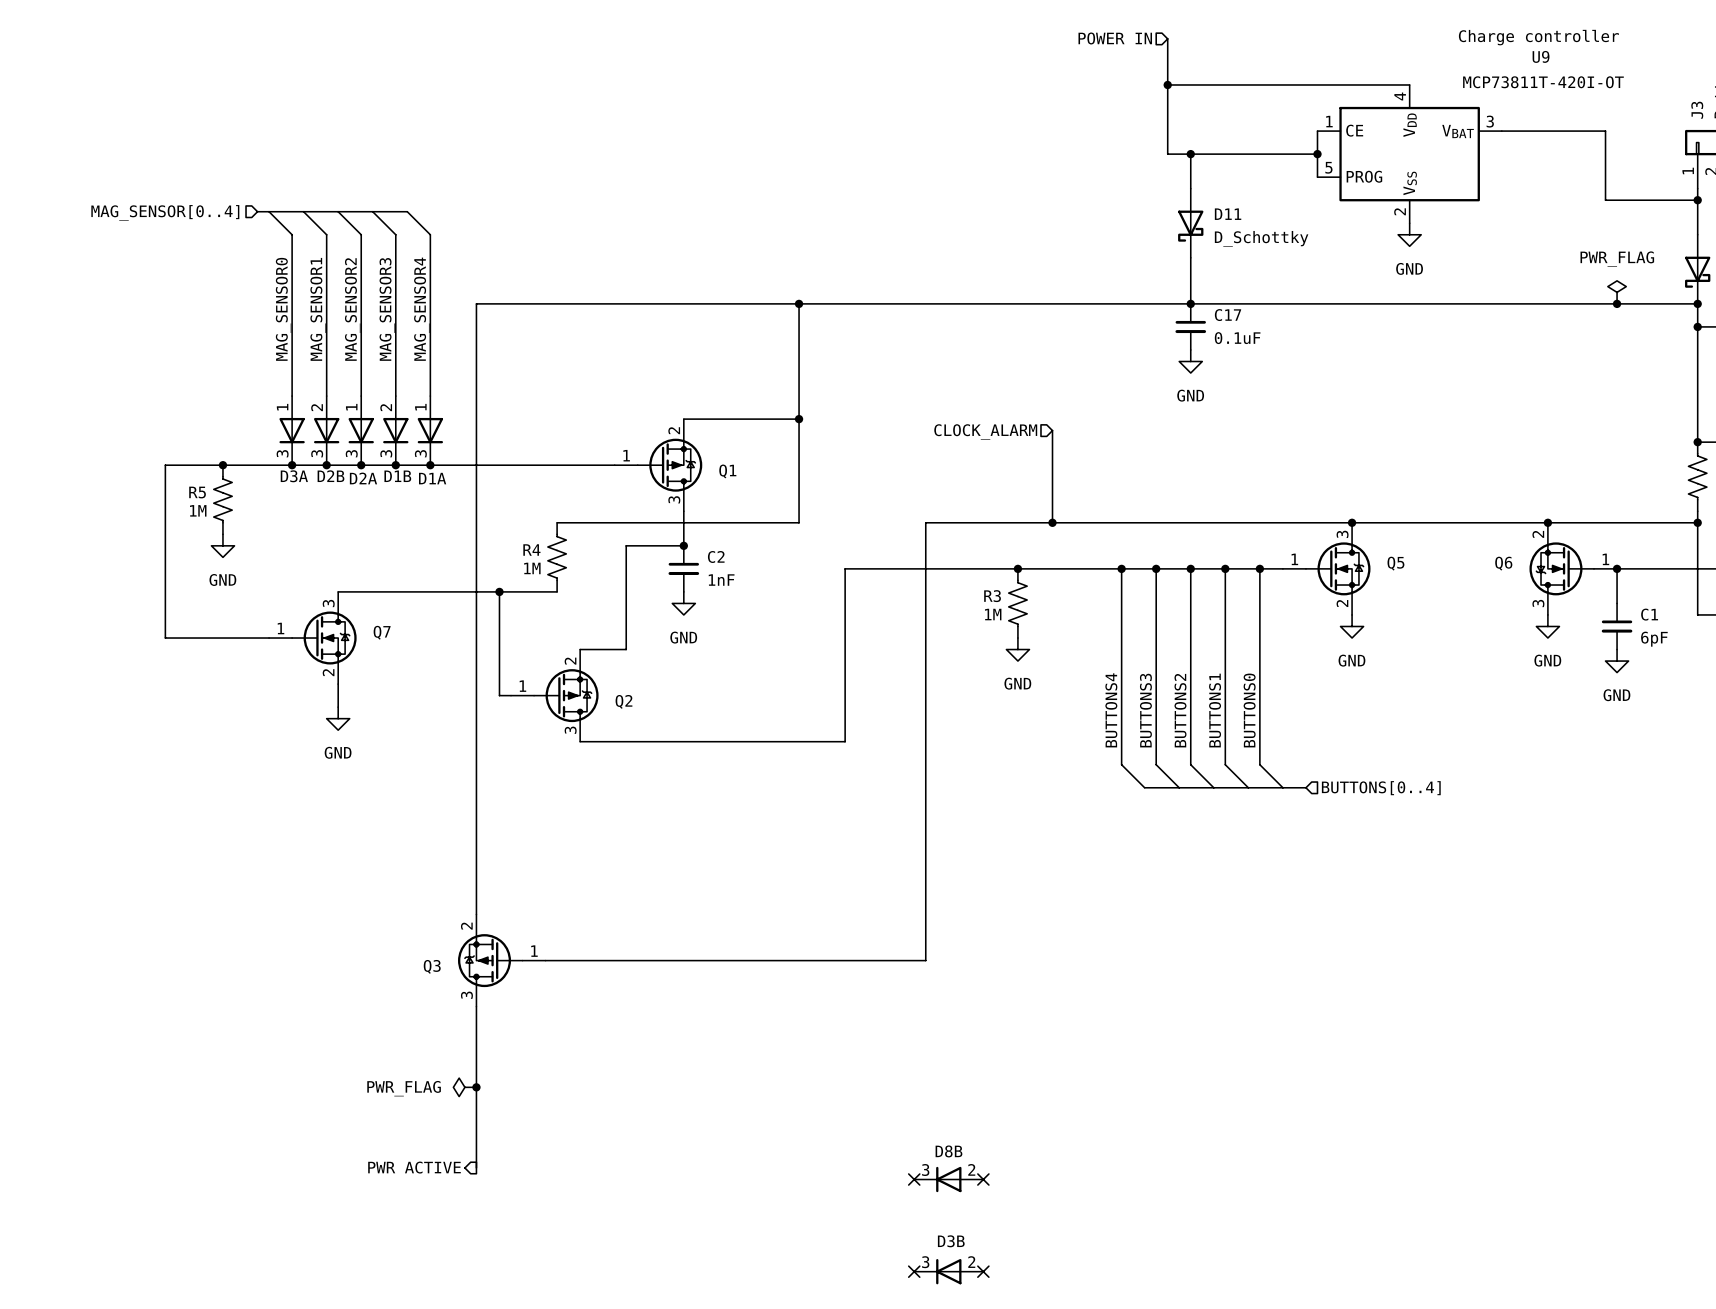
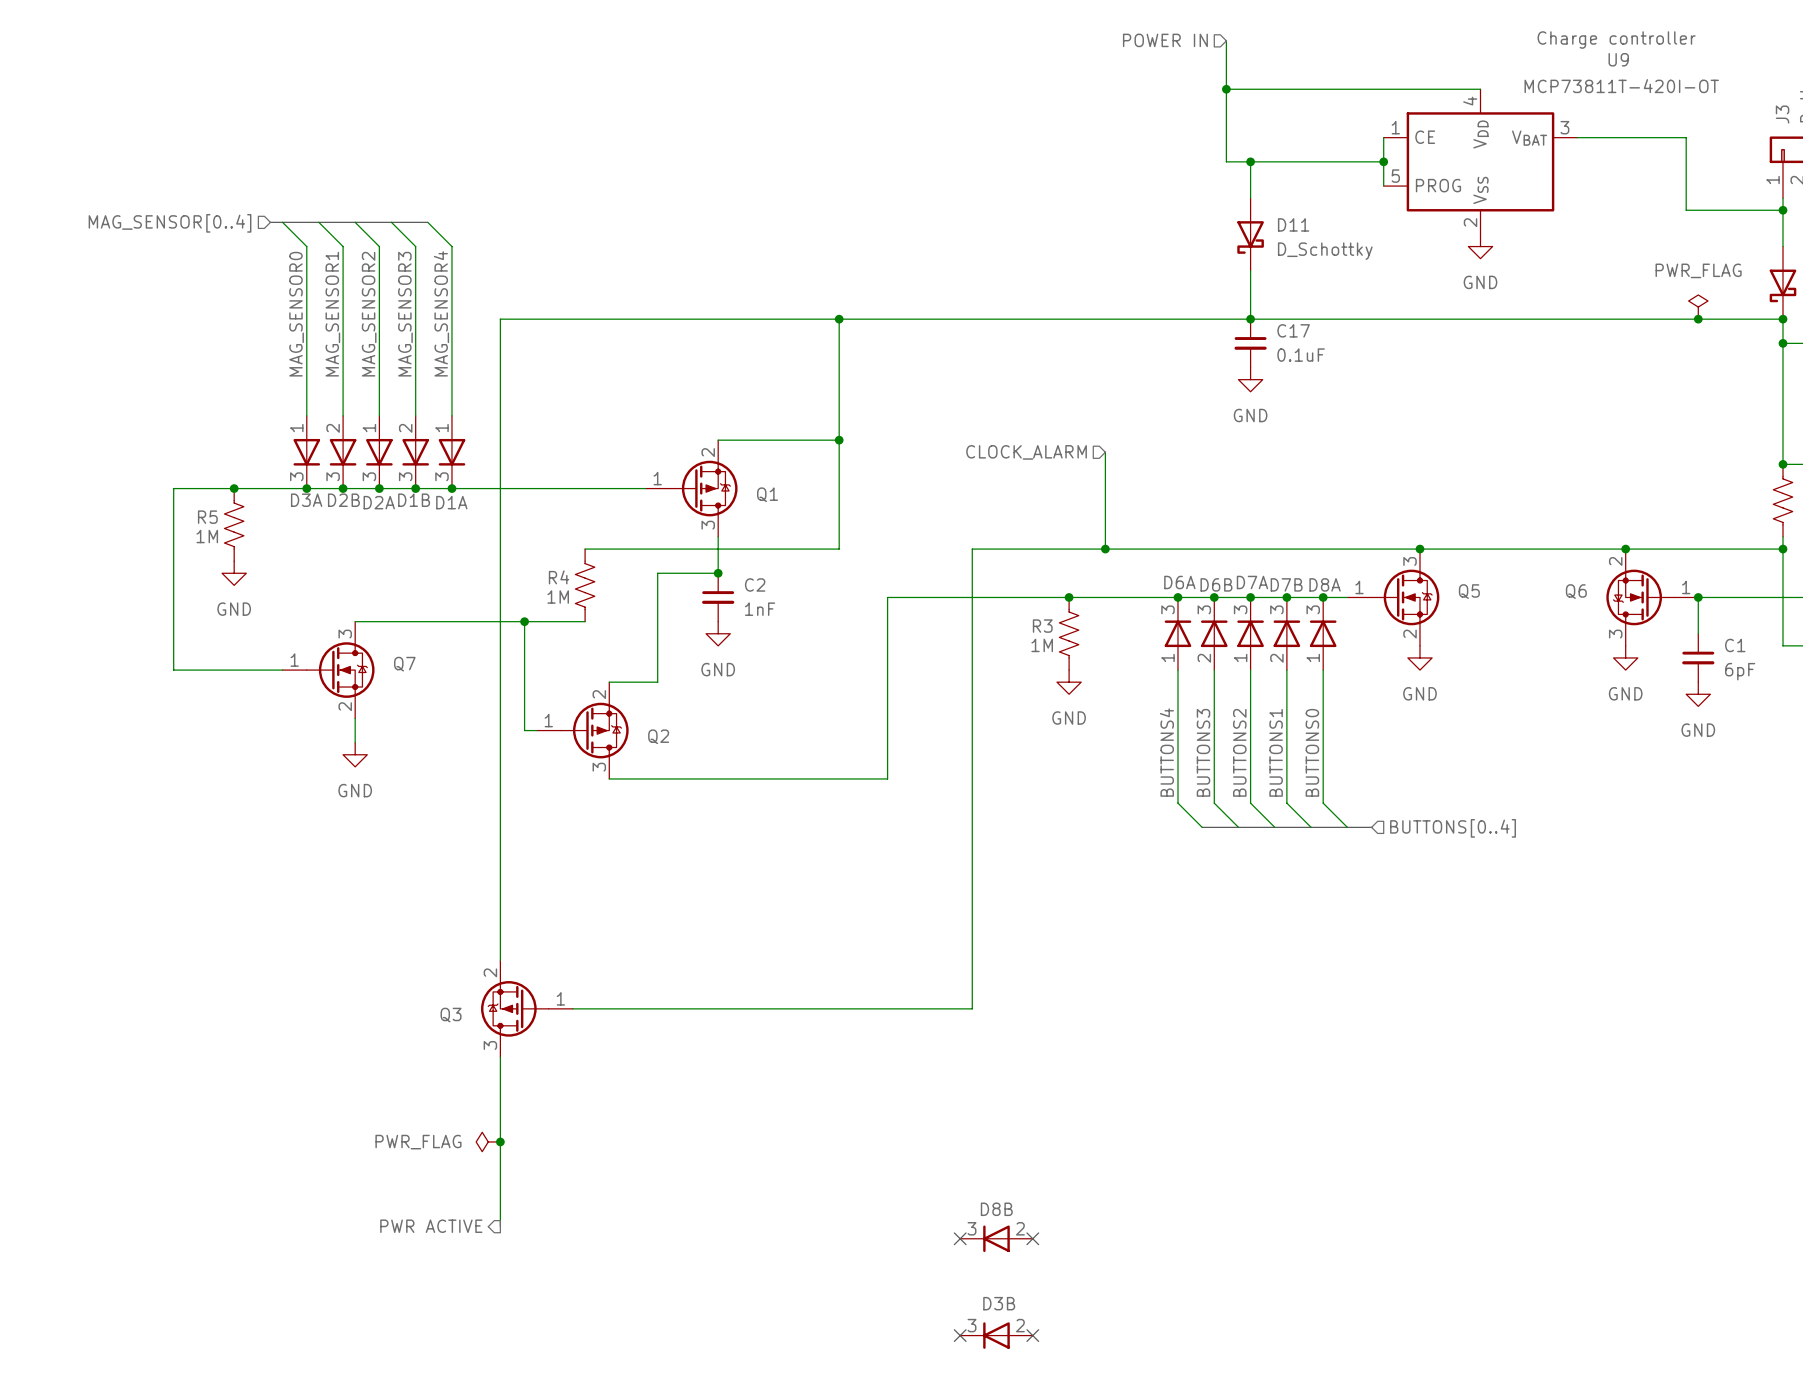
D6A: none -> (1177, 633)
D6B: none -> (1214, 633)
D7A: none -> (1250, 633)
D7B: none -> (1286, 633)
D8A: none -> (1323, 633)

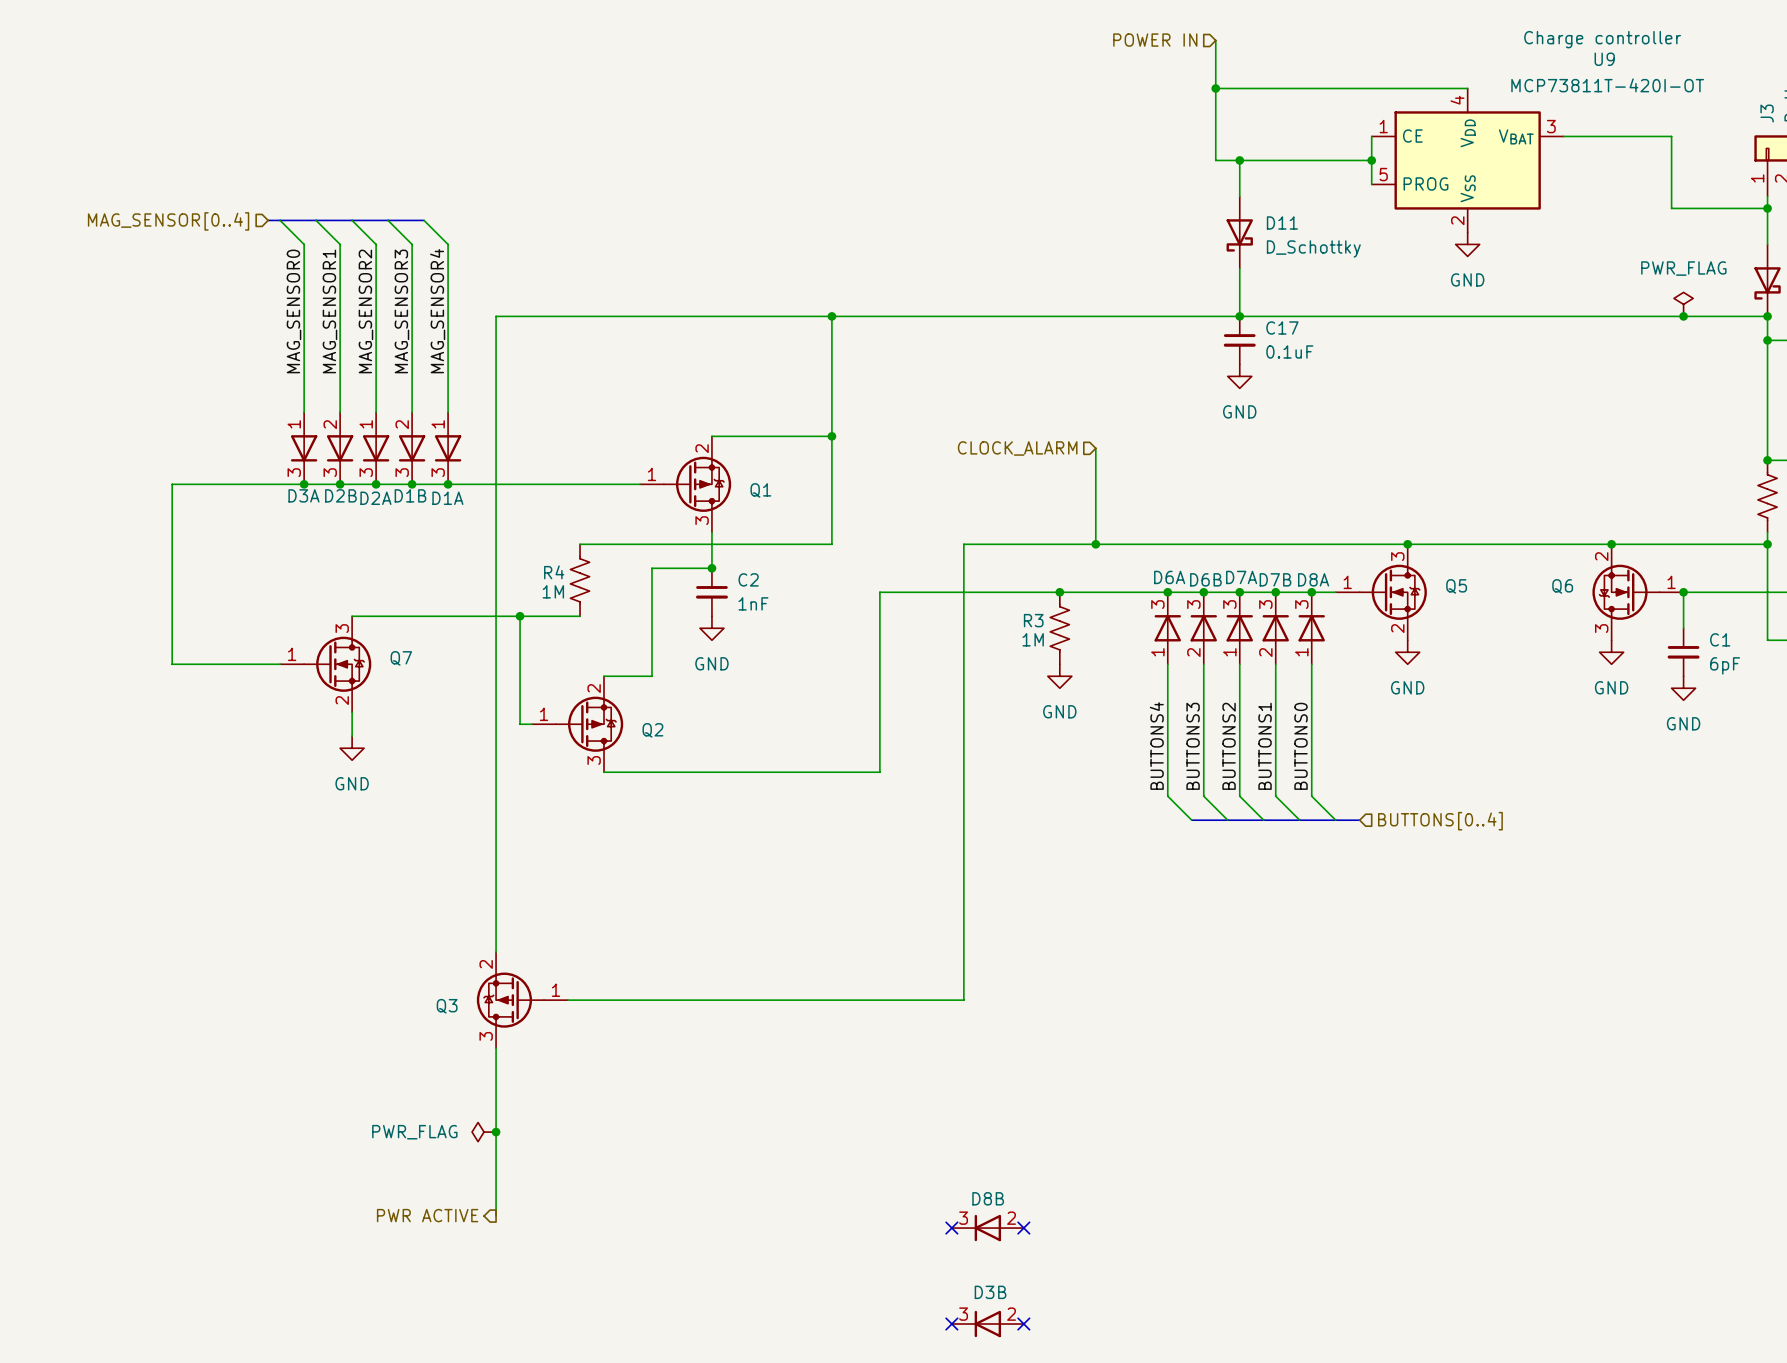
junction: (234, 488) -> none
R5: 1M (234, 524) -> none
power symbol: GND (234, 573) -> none

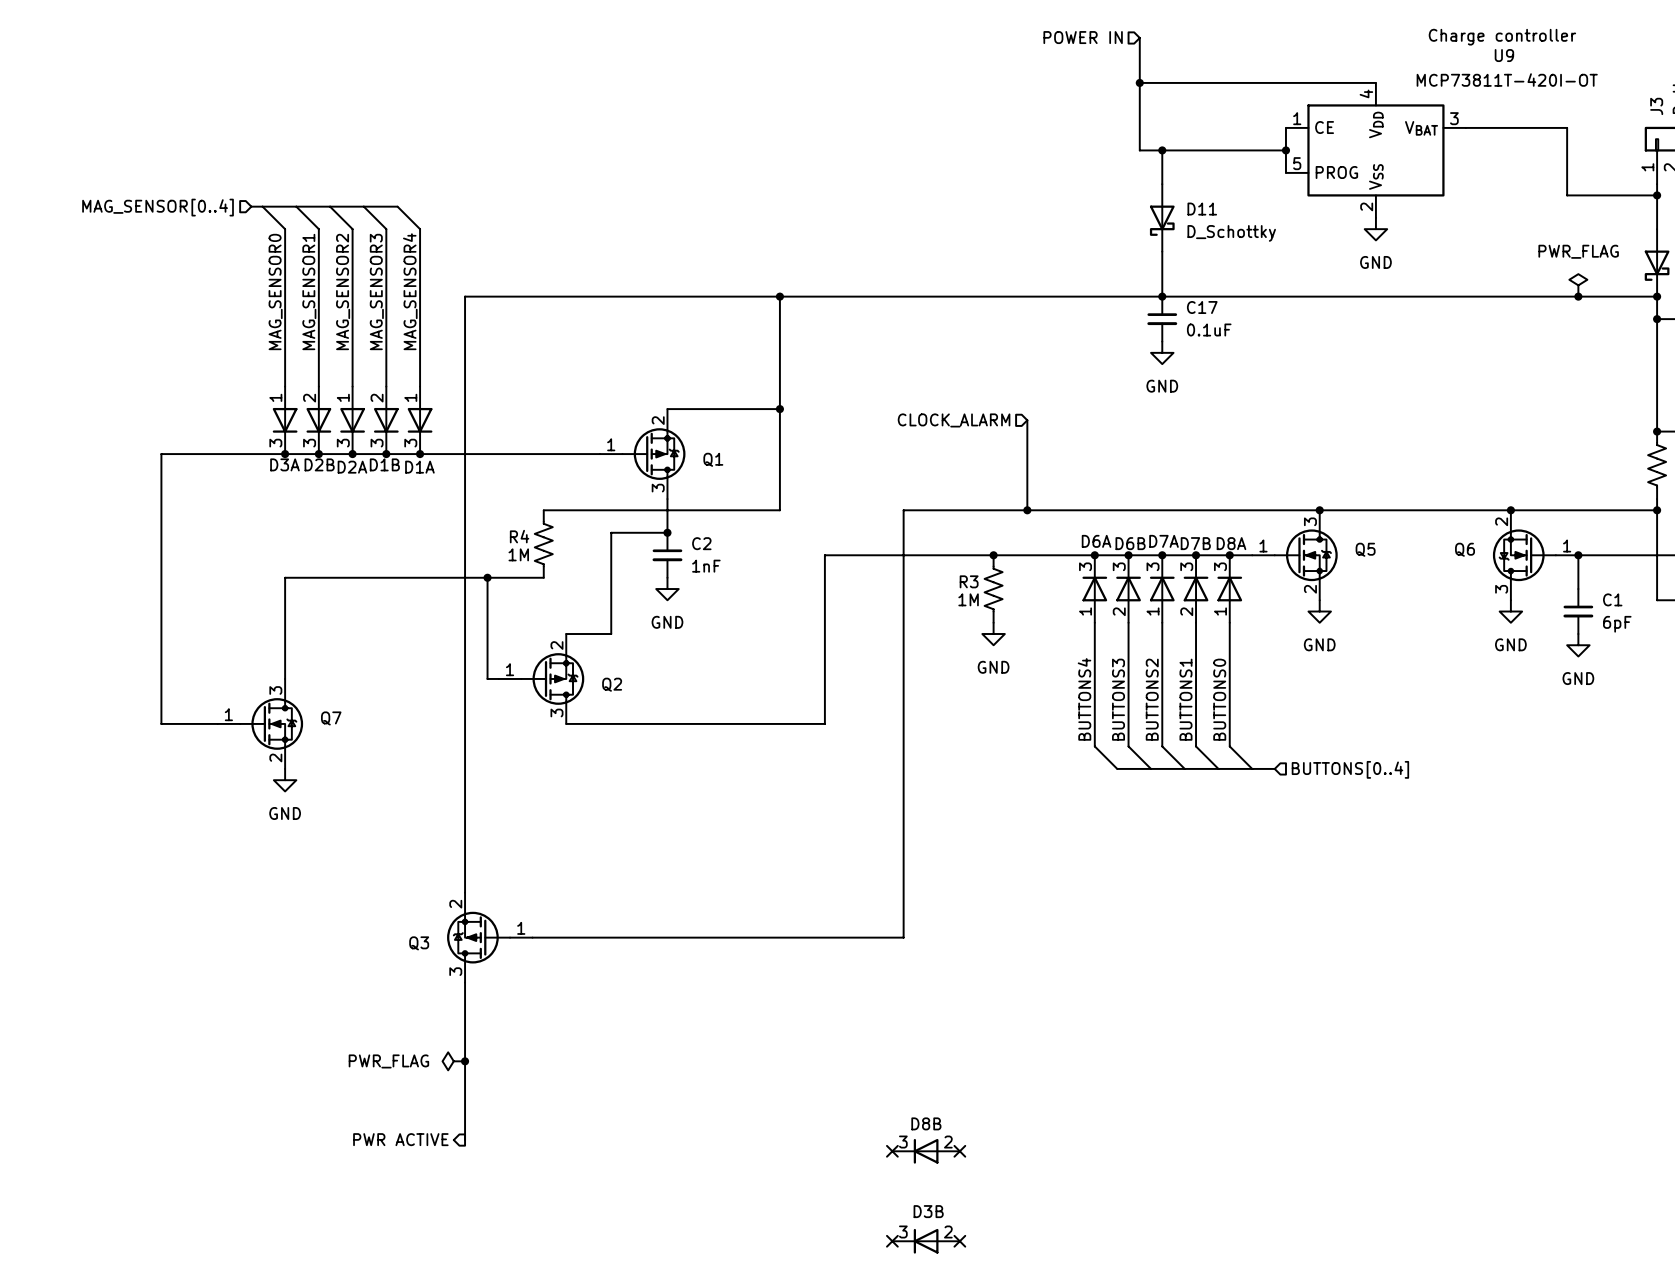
wire: none -> (330, 577) (285, 577) (285, 678)
wire: (172, 664) (280, 664) -> (161, 622) (161, 723) (217, 723)
Q7 position: (325, 664) -> (260, 723)
wire: (352, 712) (352, 736) -> none
power symbol position: GND (352, 748) -> GND (285, 780)

